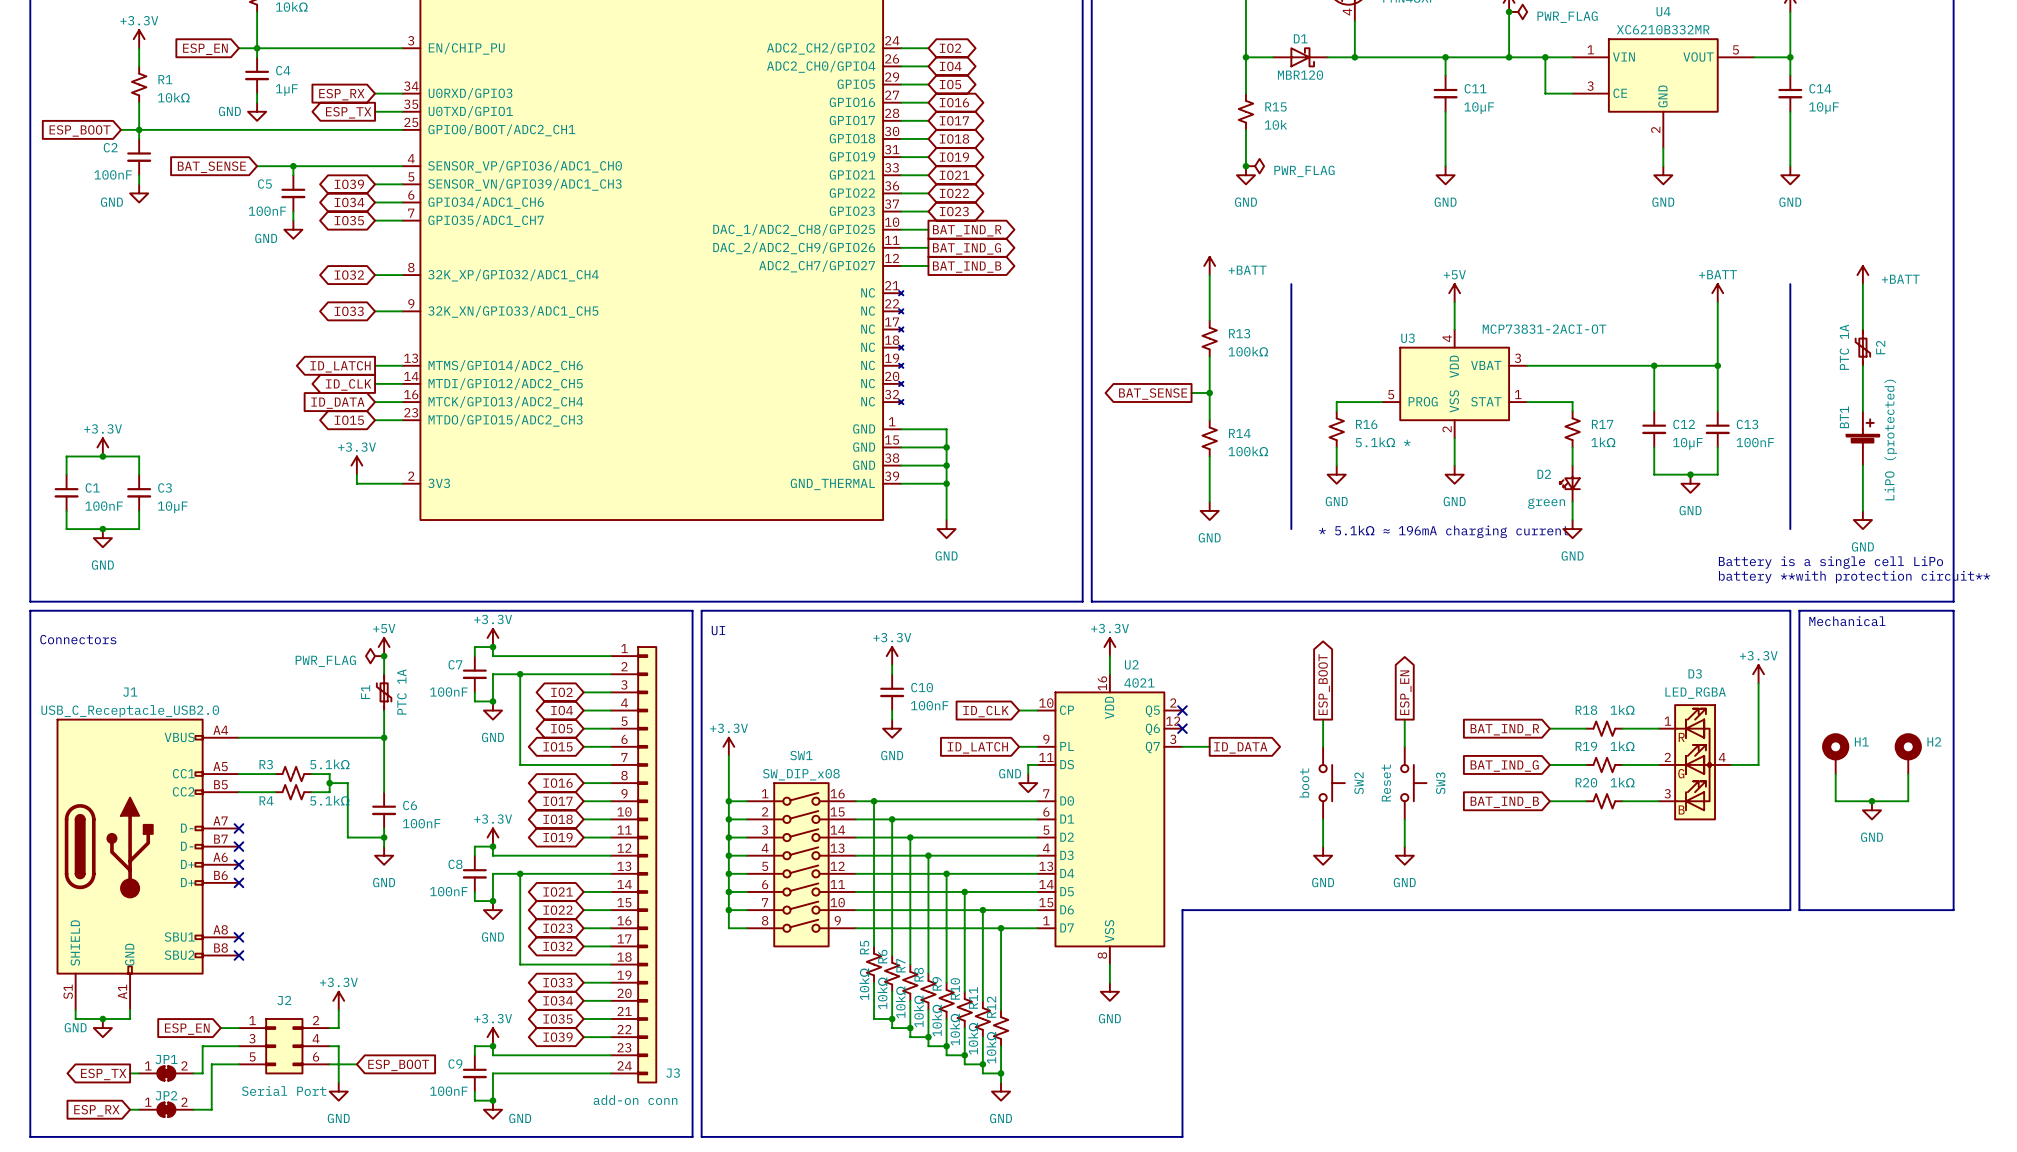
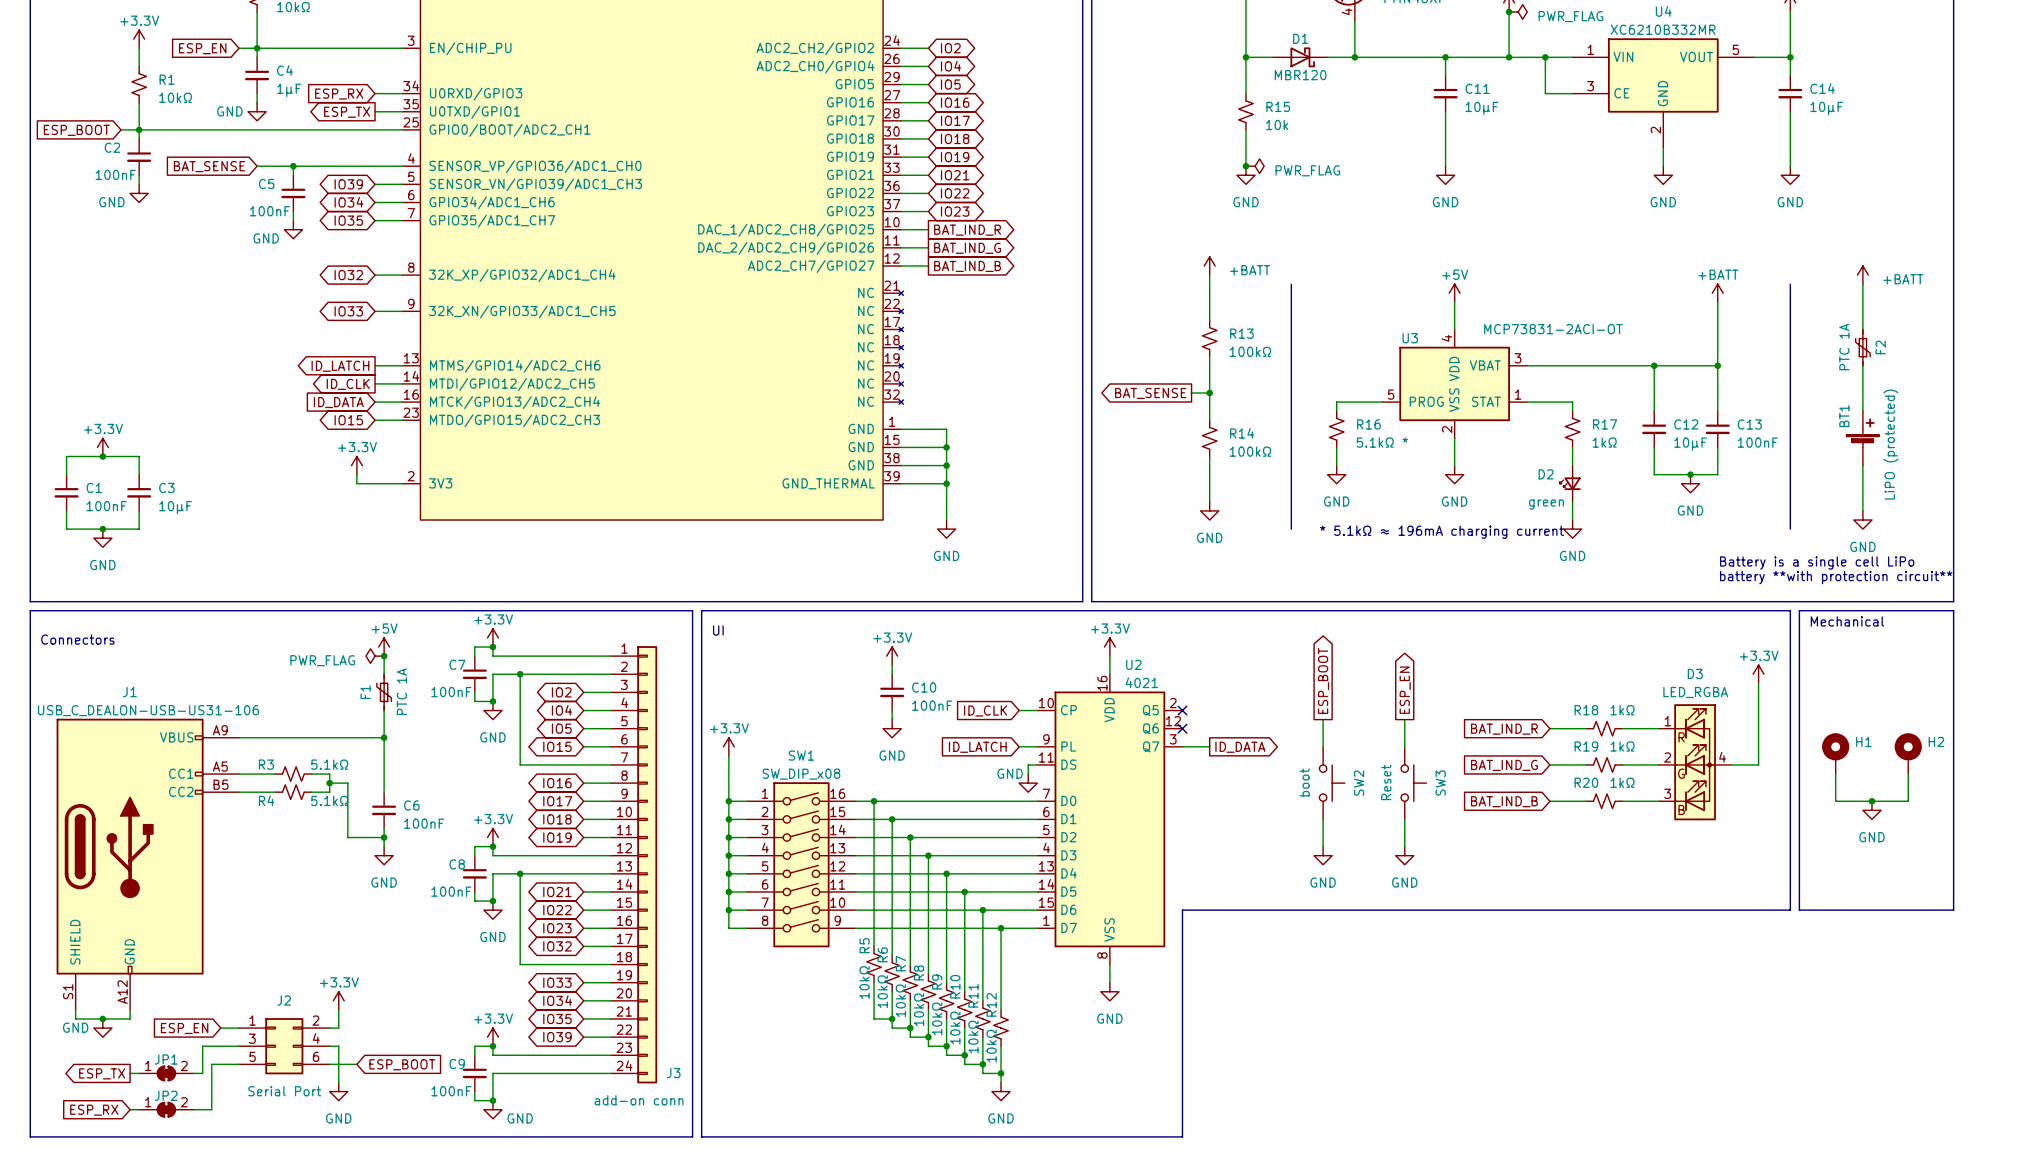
J1 value: USB_C_Receptacle_USB2.0 (130, 711) -> USB_C_DEALON-USB-US31-106 (148, 710)
J1 symbol: [56, 718, 239, 1010] -> [56, 718, 239, 1010]
no-connect mark: (238, 828) -> none
no-connect mark: (238, 846) -> none
no-connect mark: (238, 864) -> none
no-connect mark: (238, 882) -> none
no-connect mark: (238, 937) -> none
no-connect mark: (238, 955) -> none

